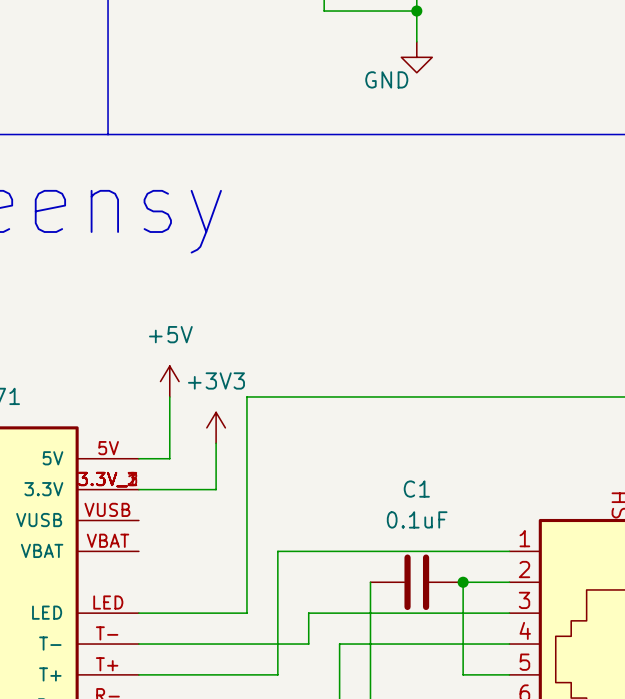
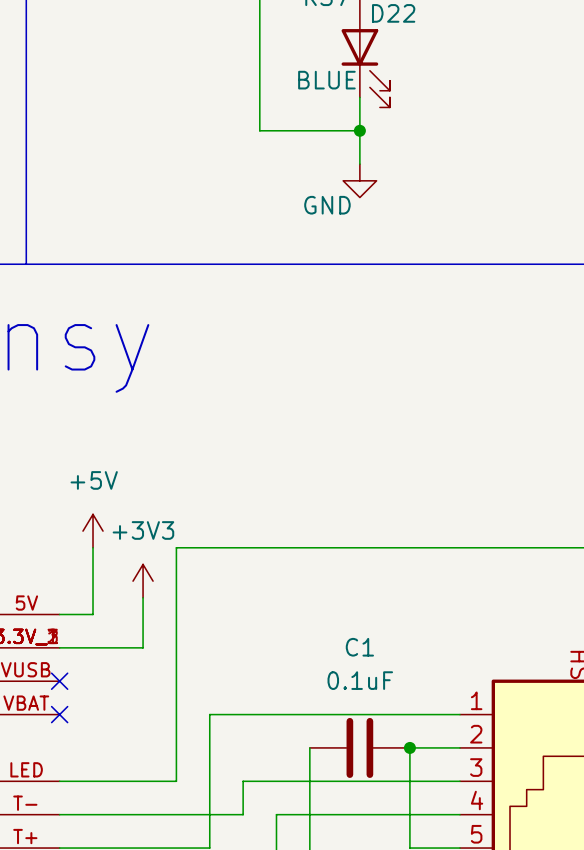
no-connect mark: none -> (59, 681)
no-connect mark: none -> (59, 714)

